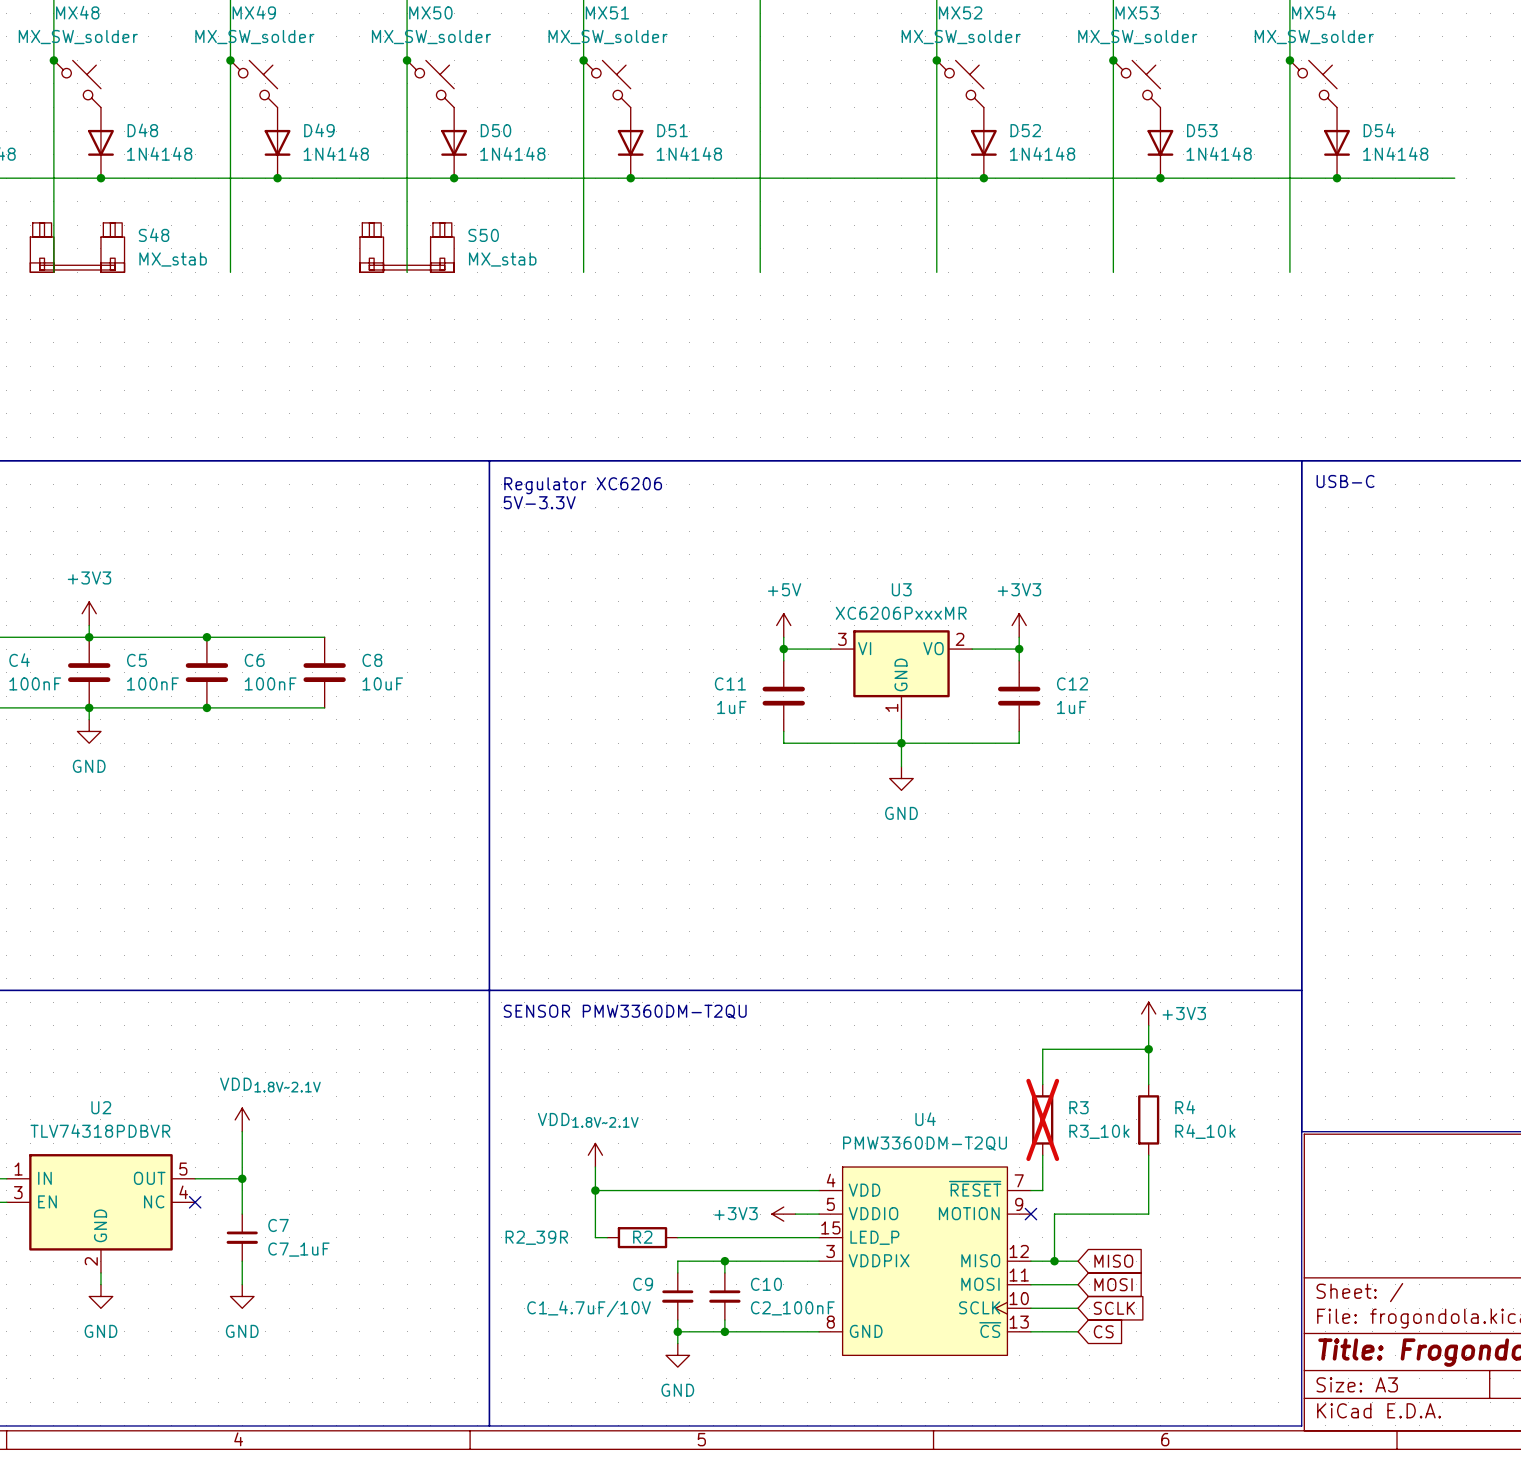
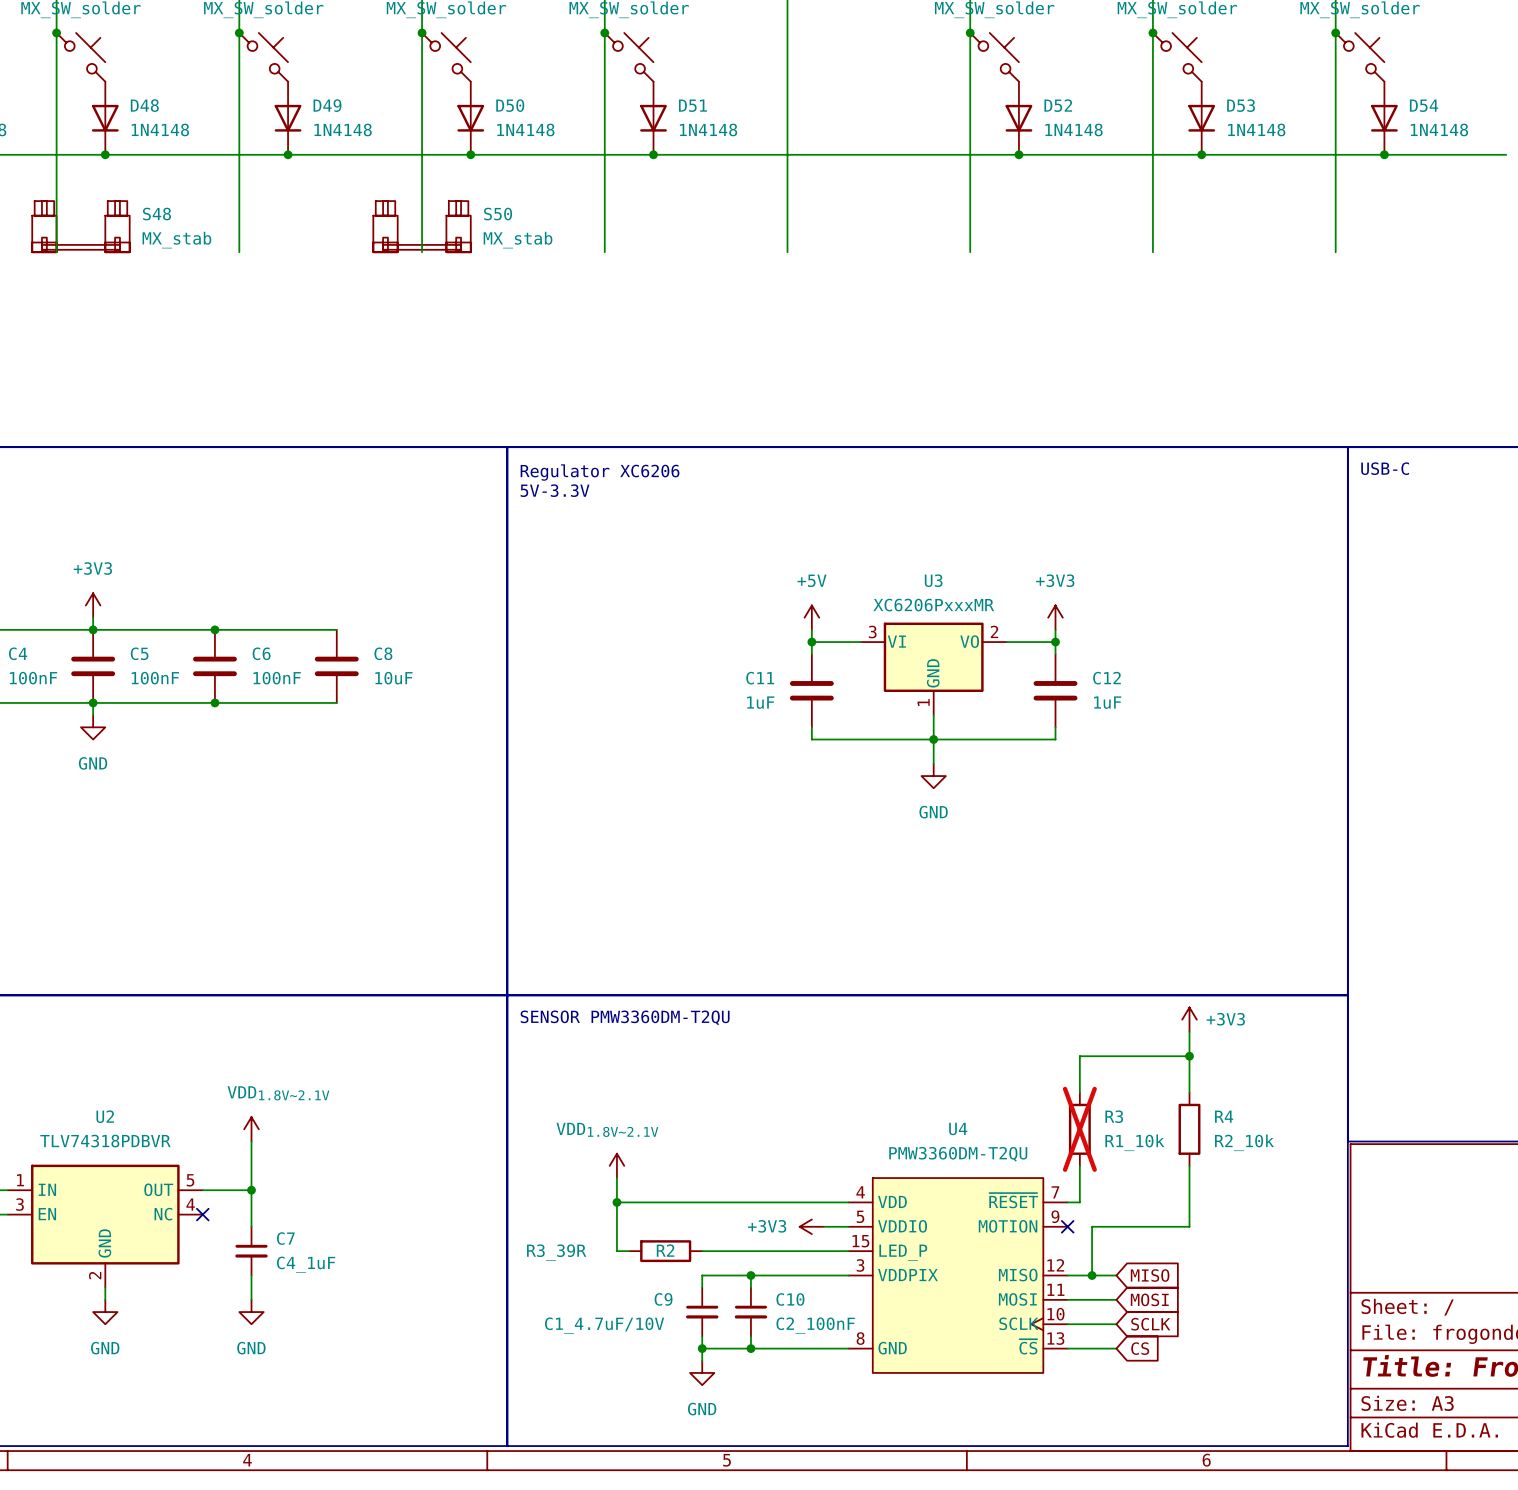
R3 value: R3_10k (1099, 1131) -> R1_10k (1134, 1142)
R4 value: R4_10k (1205, 1131) -> R2_10k (1244, 1142)
R2 value: R2_39R (536, 1237) -> R3_39R (556, 1252)
C7 value: C7_1uF (298, 1249) -> C4_1uF (306, 1264)

